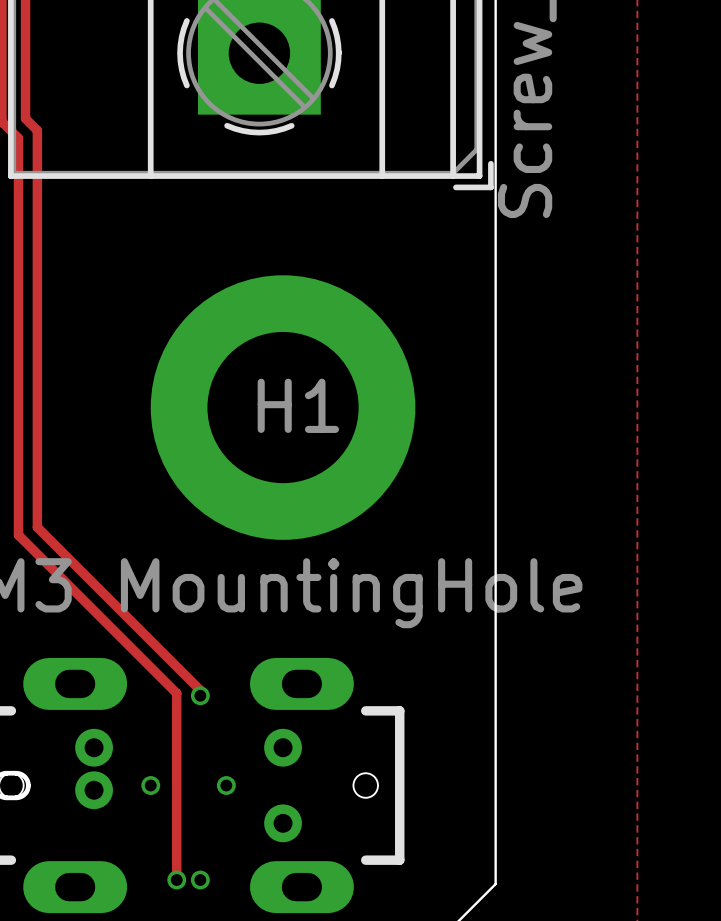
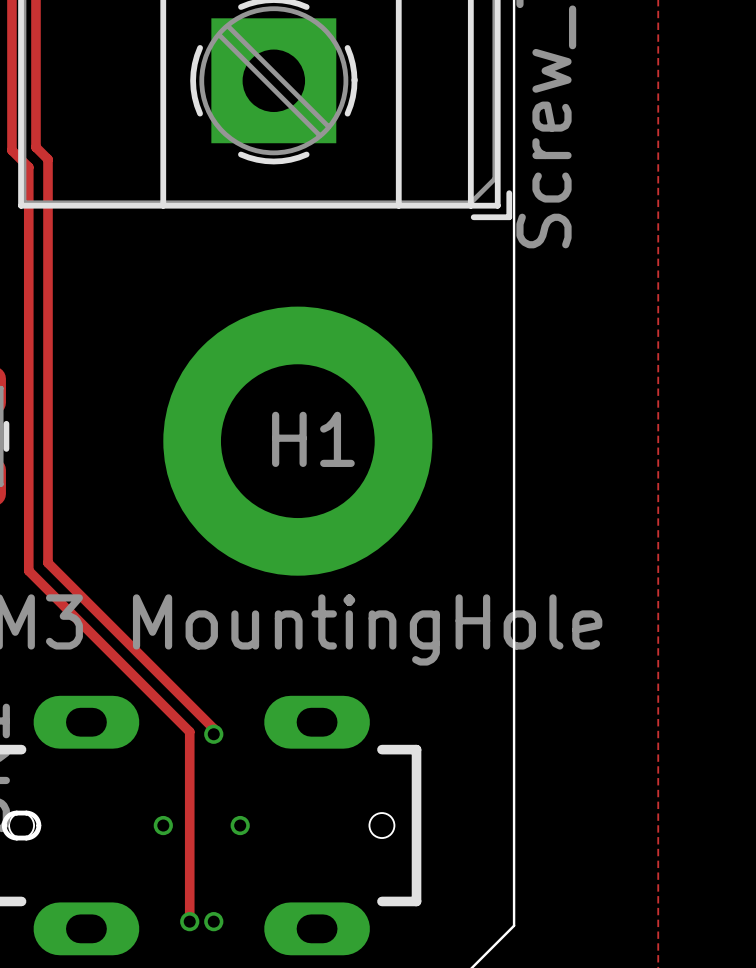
via: (94, 747) -> none
via: (283, 747) -> none
via: (94, 790) -> none
via: (283, 823) -> none

